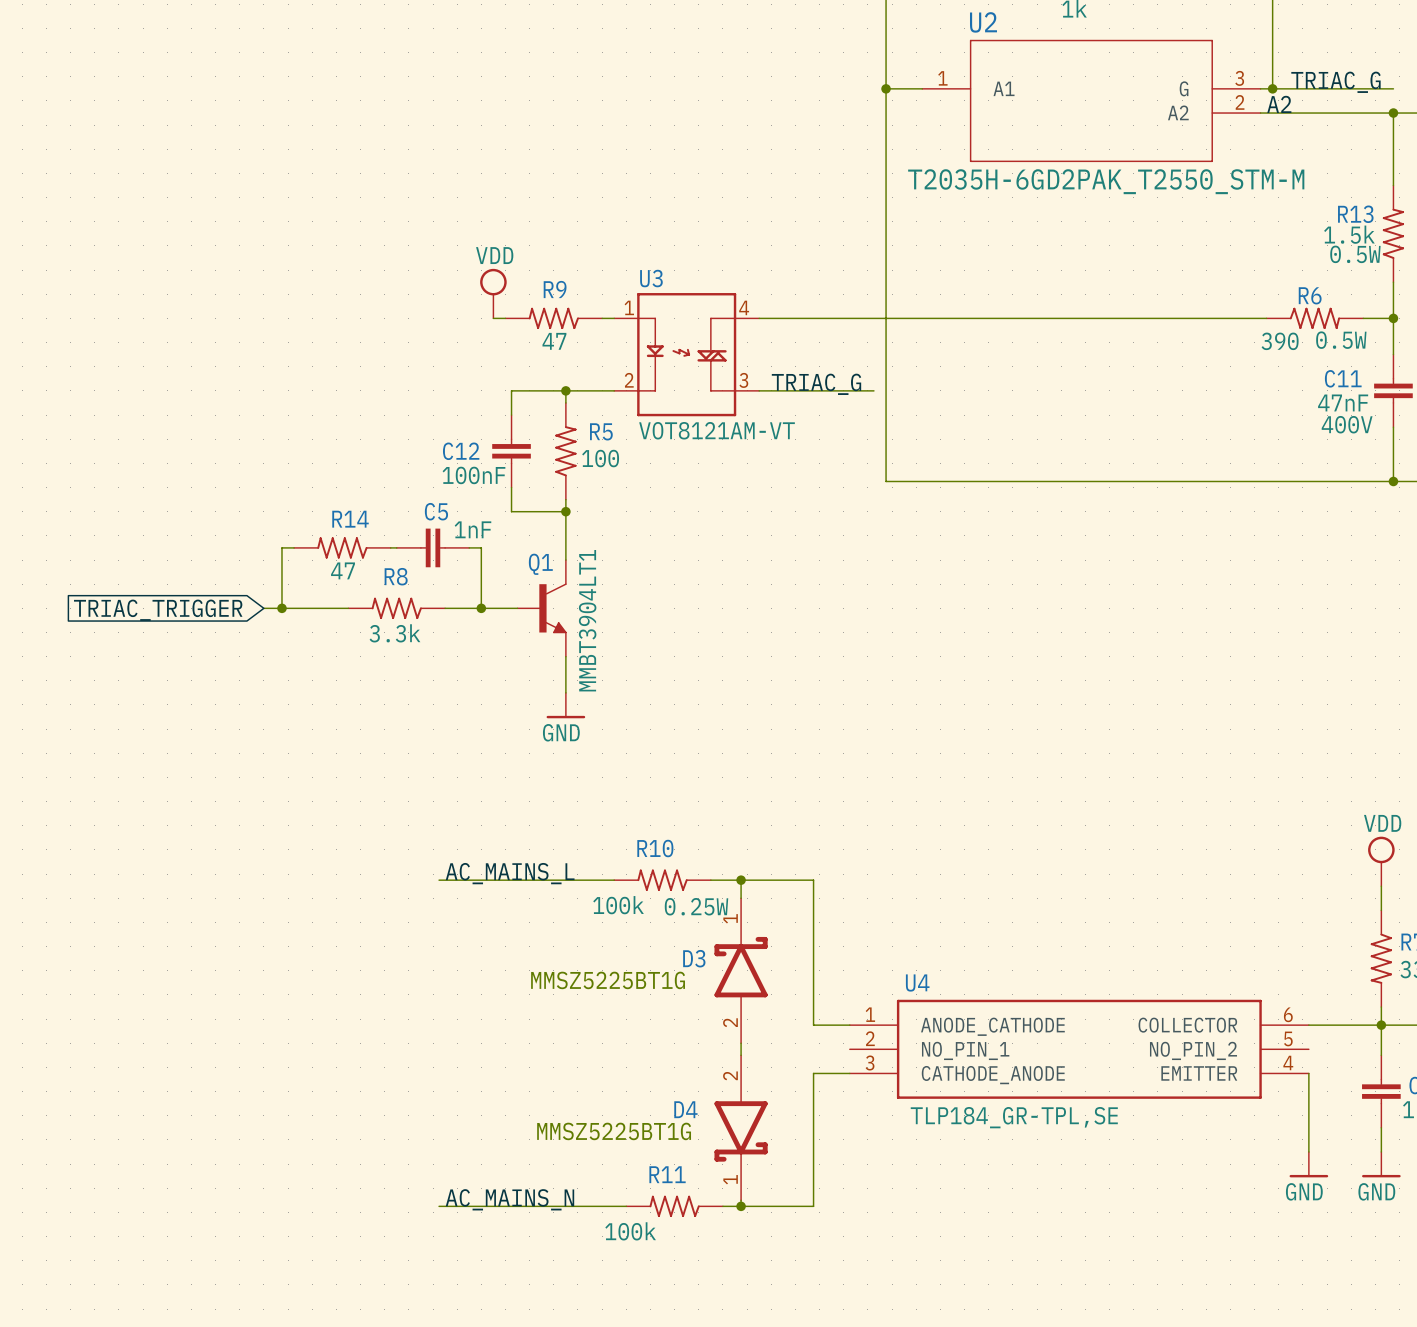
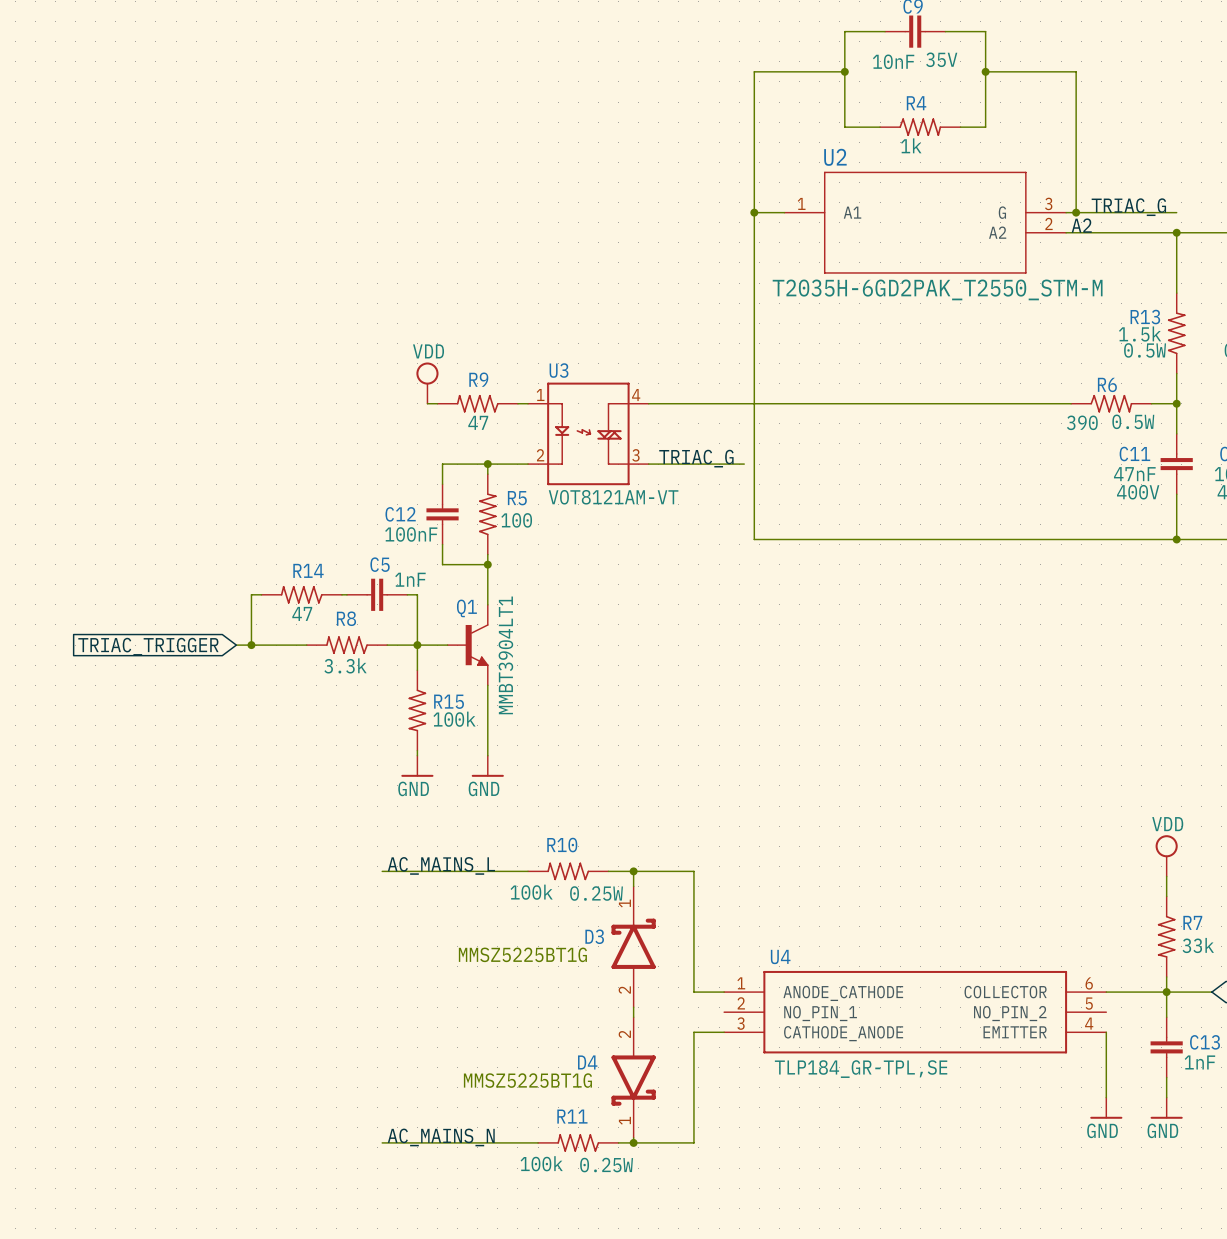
wire: none -> (417, 645) (417, 670)
R15: none -> 100k (417, 710)
power symbol position: GND (565, 705) -> GND (487, 766)
wire: none -> (417, 750) (417, 755)
power symbol: none -> GND (417, 766)
R11 text: none -> 0.25W (606, 1165)

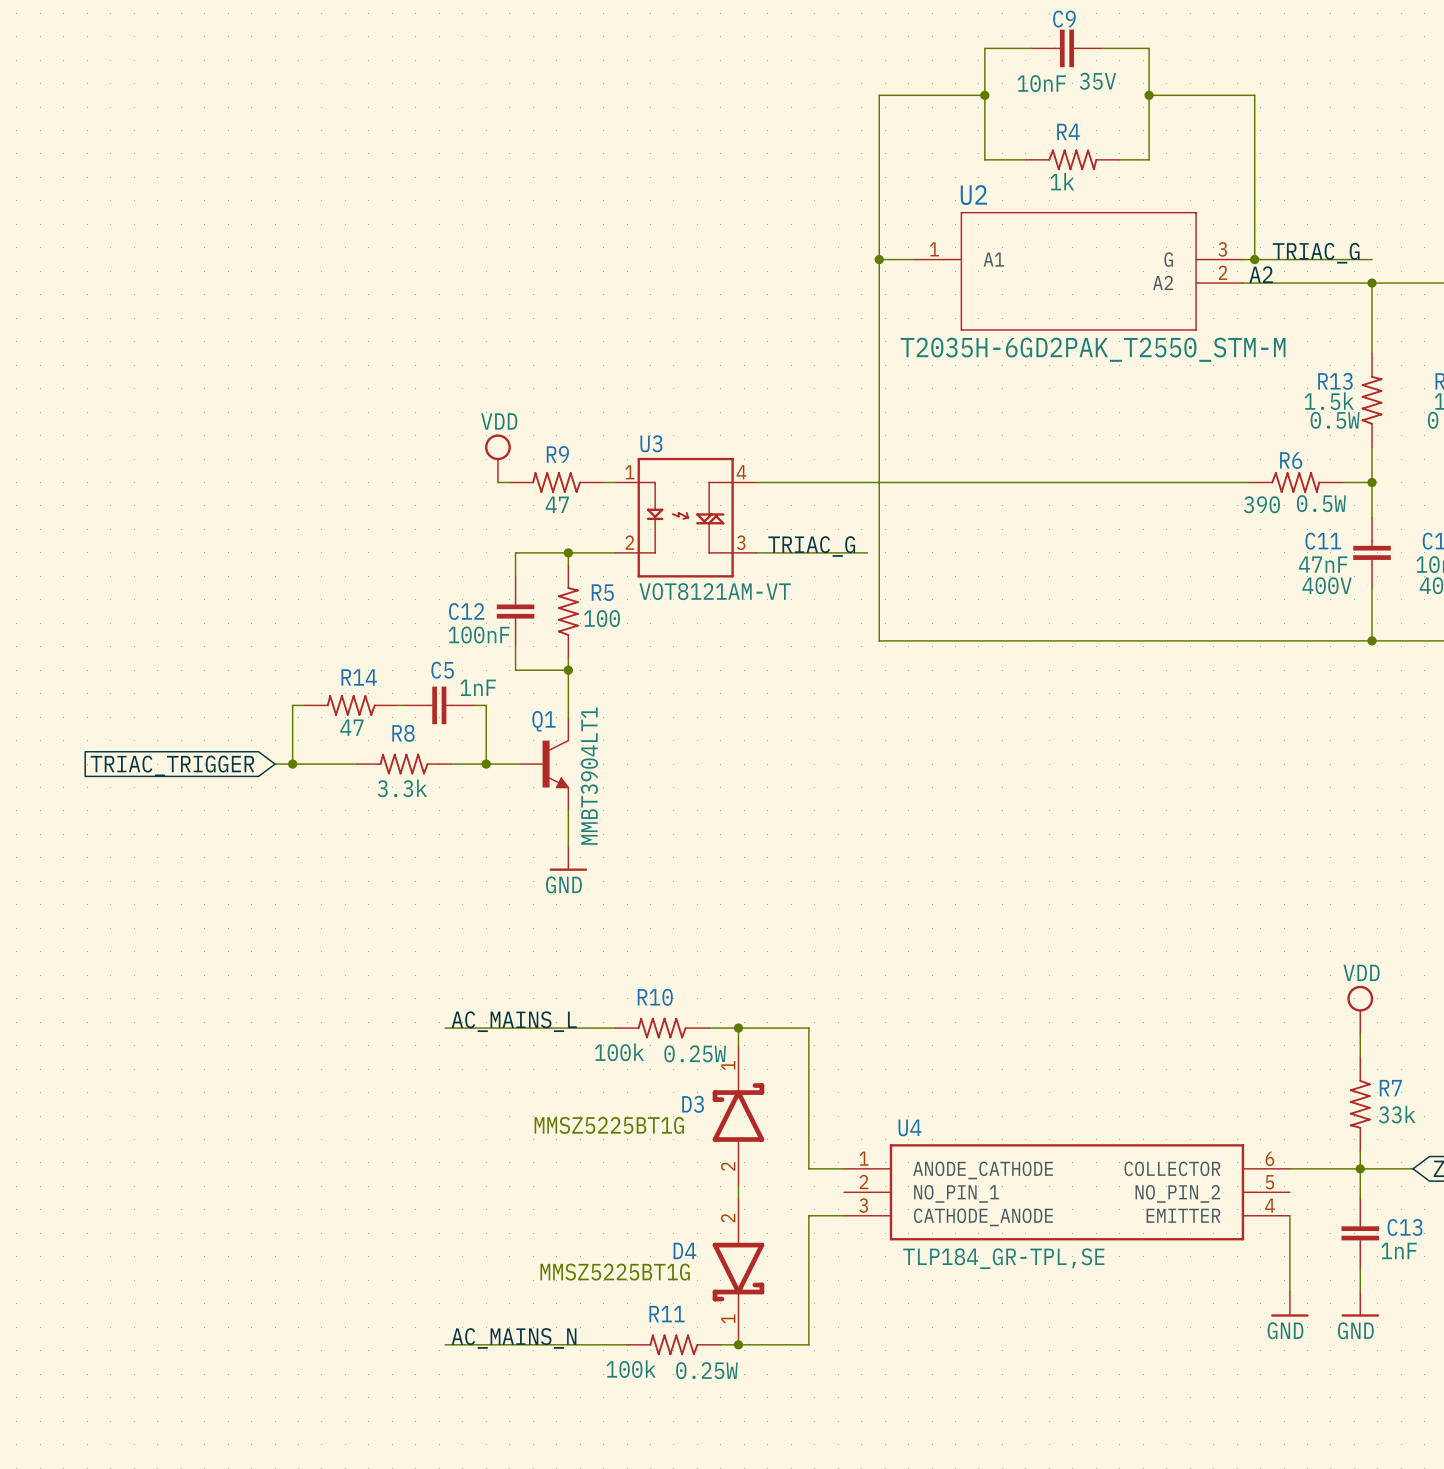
wire: (417, 645) (417, 670) -> none
R15: 100k (417, 710) -> none
wire: (417, 750) (417, 755) -> none
power symbol: GND (417, 766) -> none
power symbol position: GND (487, 766) -> GND (568, 858)

